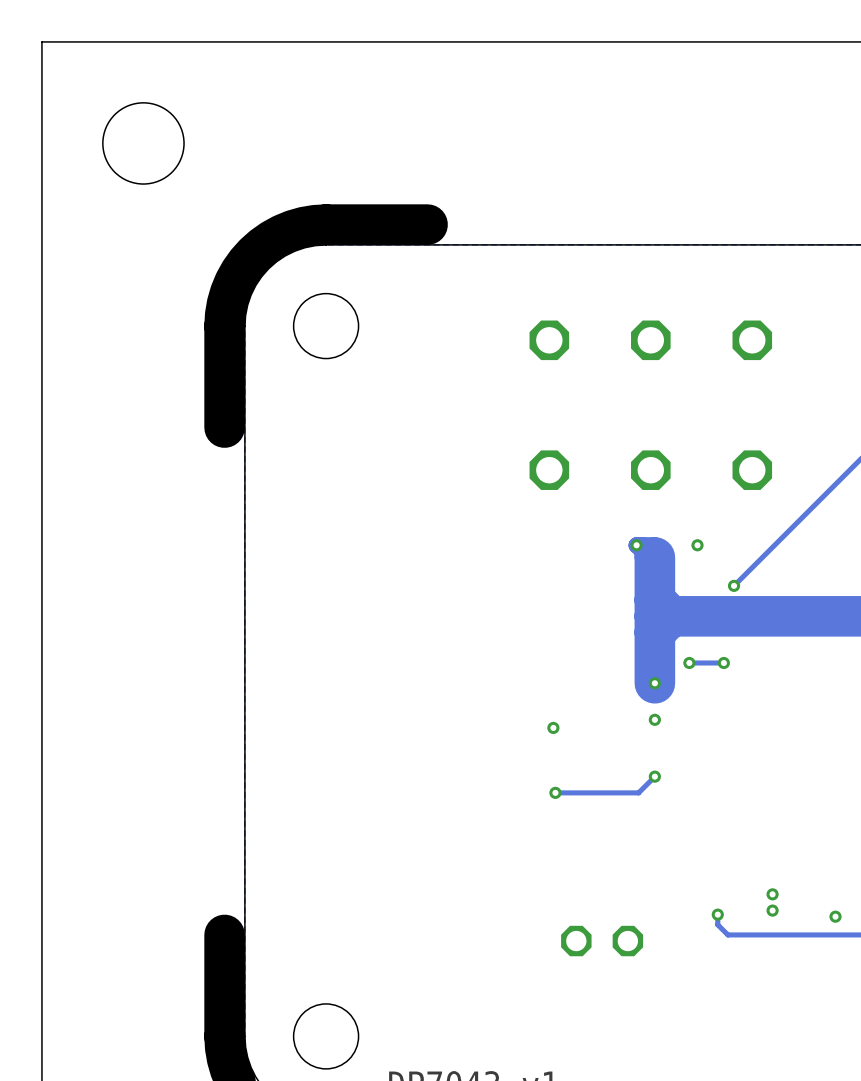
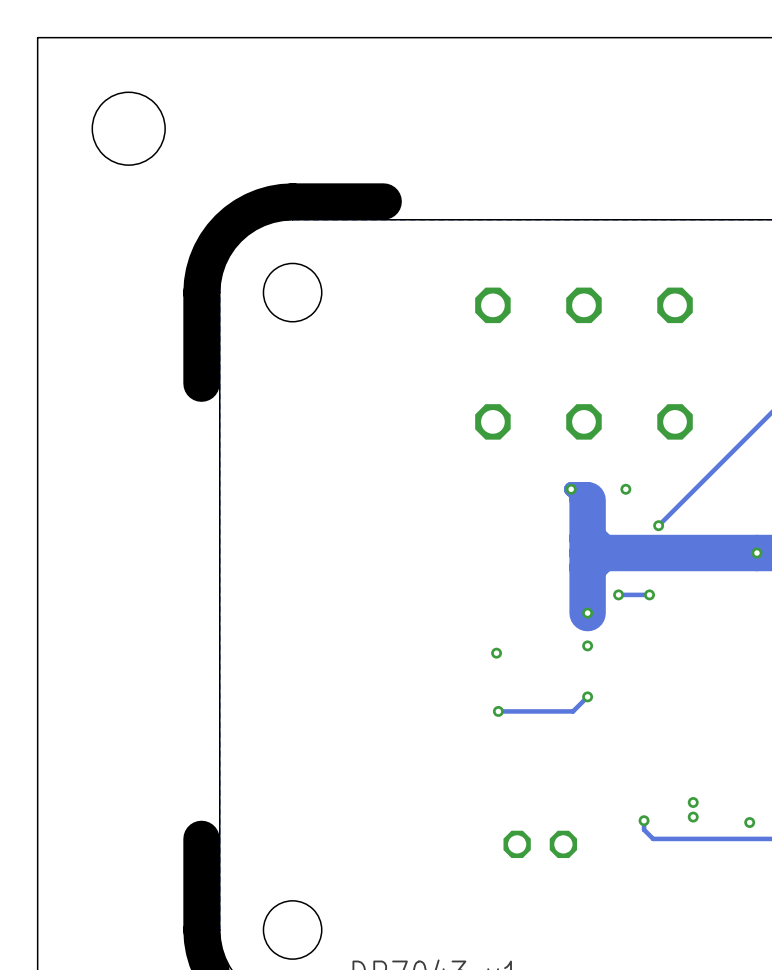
via: none -> (756, 553)

